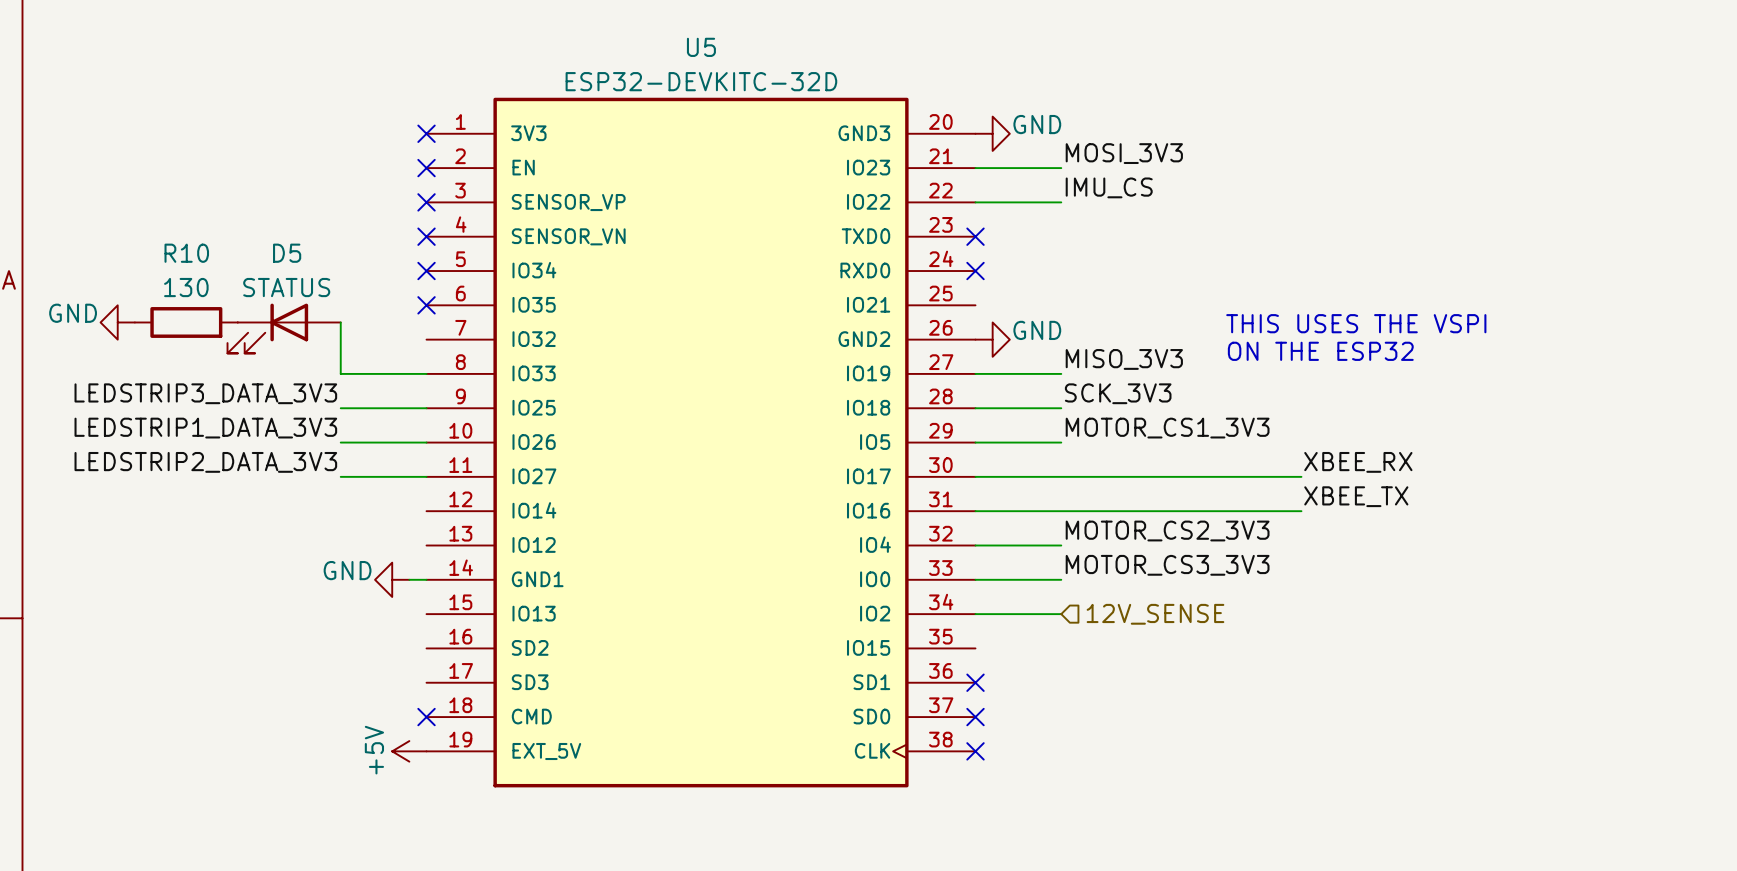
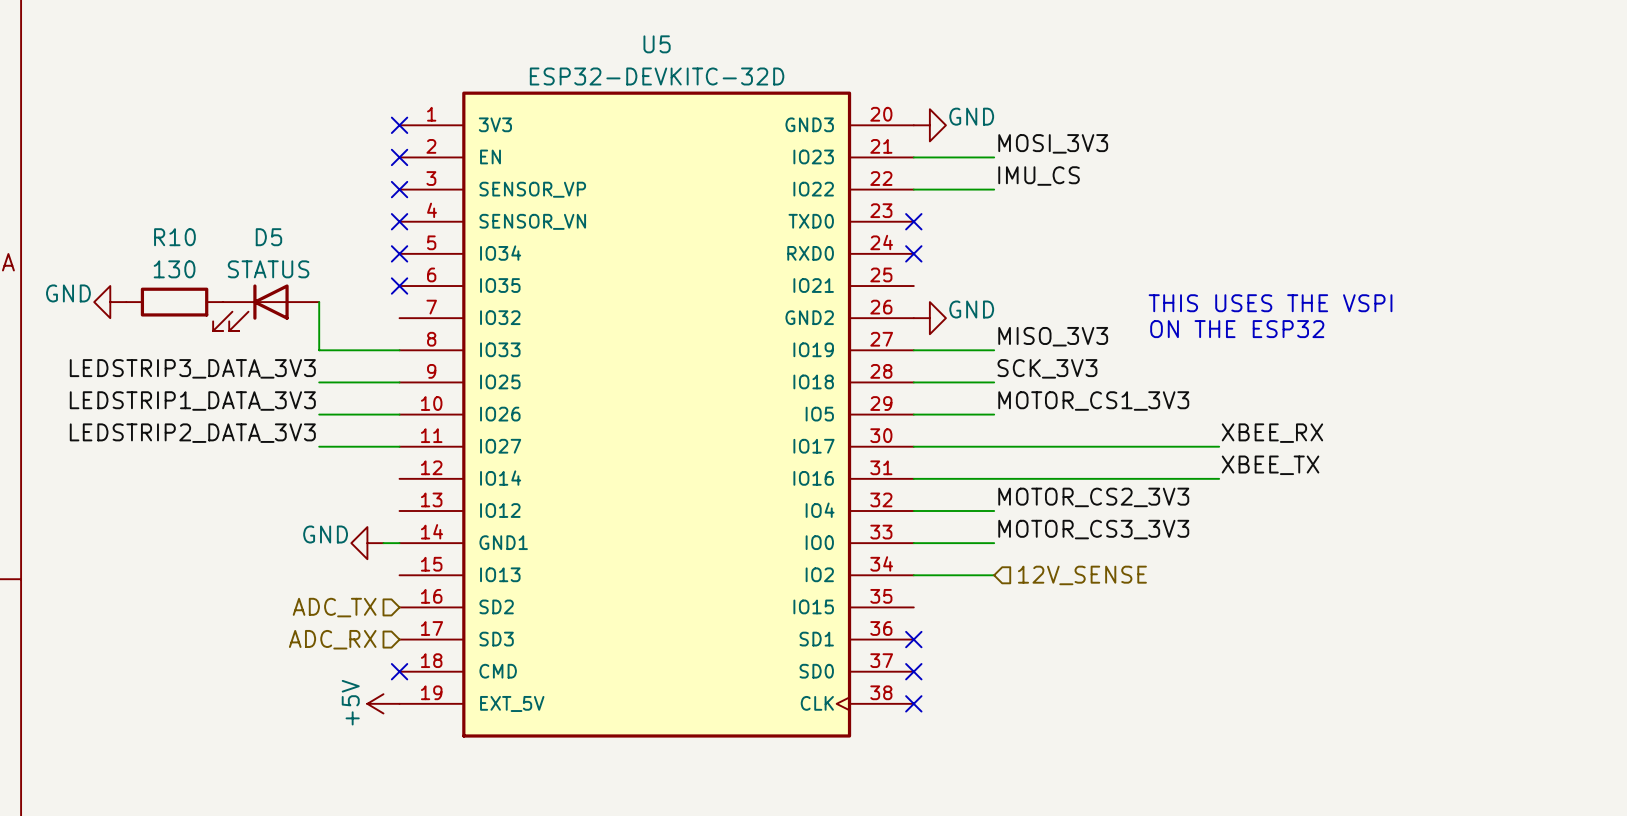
hierarchical label: none -> ADC_TX (334, 607)
hierarchical label: none -> ADC_RX (332, 639)

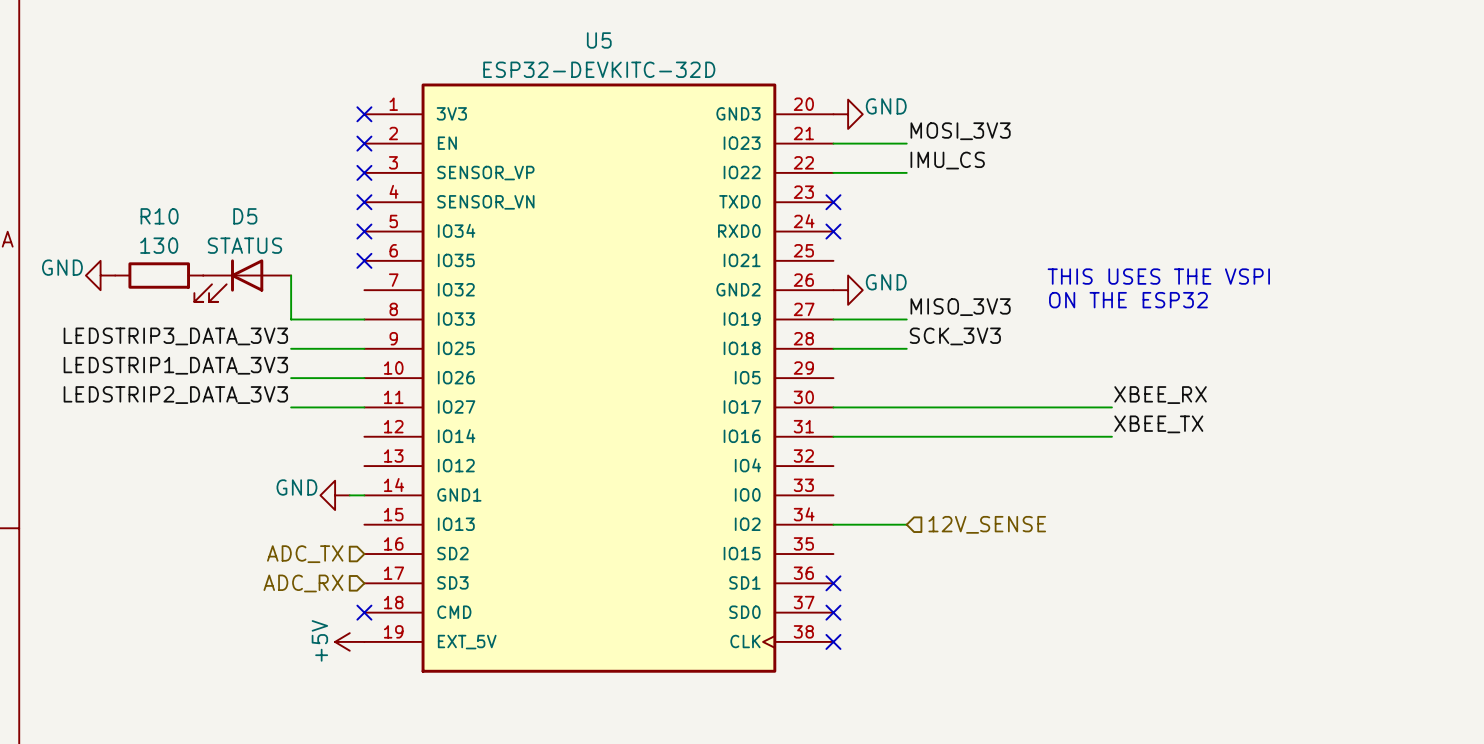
label: MOTOR_CS1_3V3 (1093, 401) -> none
wire: (913, 414) (994, 414) -> none
label: MOTOR_CS2_3V3 (1093, 497) -> none
wire: (913, 511) (994, 511) -> none
label: MOTOR_CS3_3V3 (1093, 529) -> none
wire: (913, 543) (994, 543) -> none

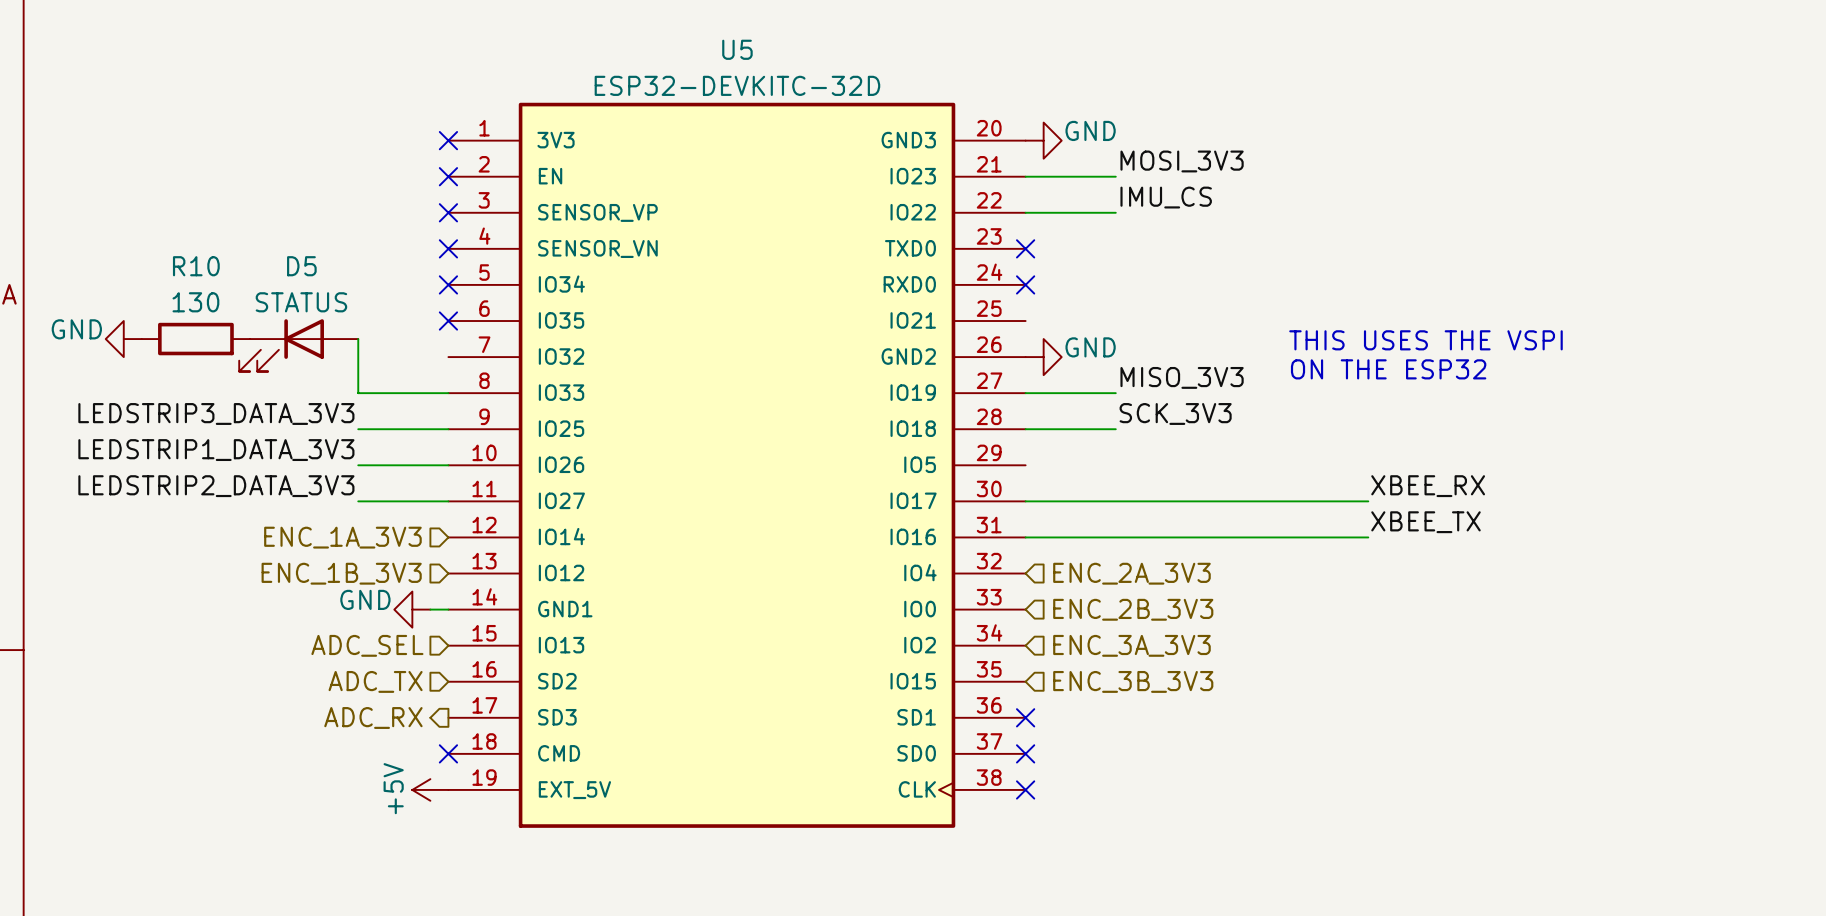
hierarchical label: none -> ENC_1A_3V3 (342, 537)
hierarchical label: none -> ENC_1B_3V3 (341, 573)
hierarchical label: none -> ENC_2A_3V3 (1131, 573)
hierarchical label: none -> ENC_2B_3V3 (1133, 609)
hierarchical label: none -> ADC_SEL (367, 645)
wire: (833, 524) (906, 524) -> none
hierarchical label: none -> ENC_3A_3V3 (1131, 645)
hierarchical label: 12V_SENSE (987, 524) -> none
hierarchical label: none -> ENC_3B_3V3 (1133, 681)
hierarchical label shape: input (303, 583) -> output (373, 717)

